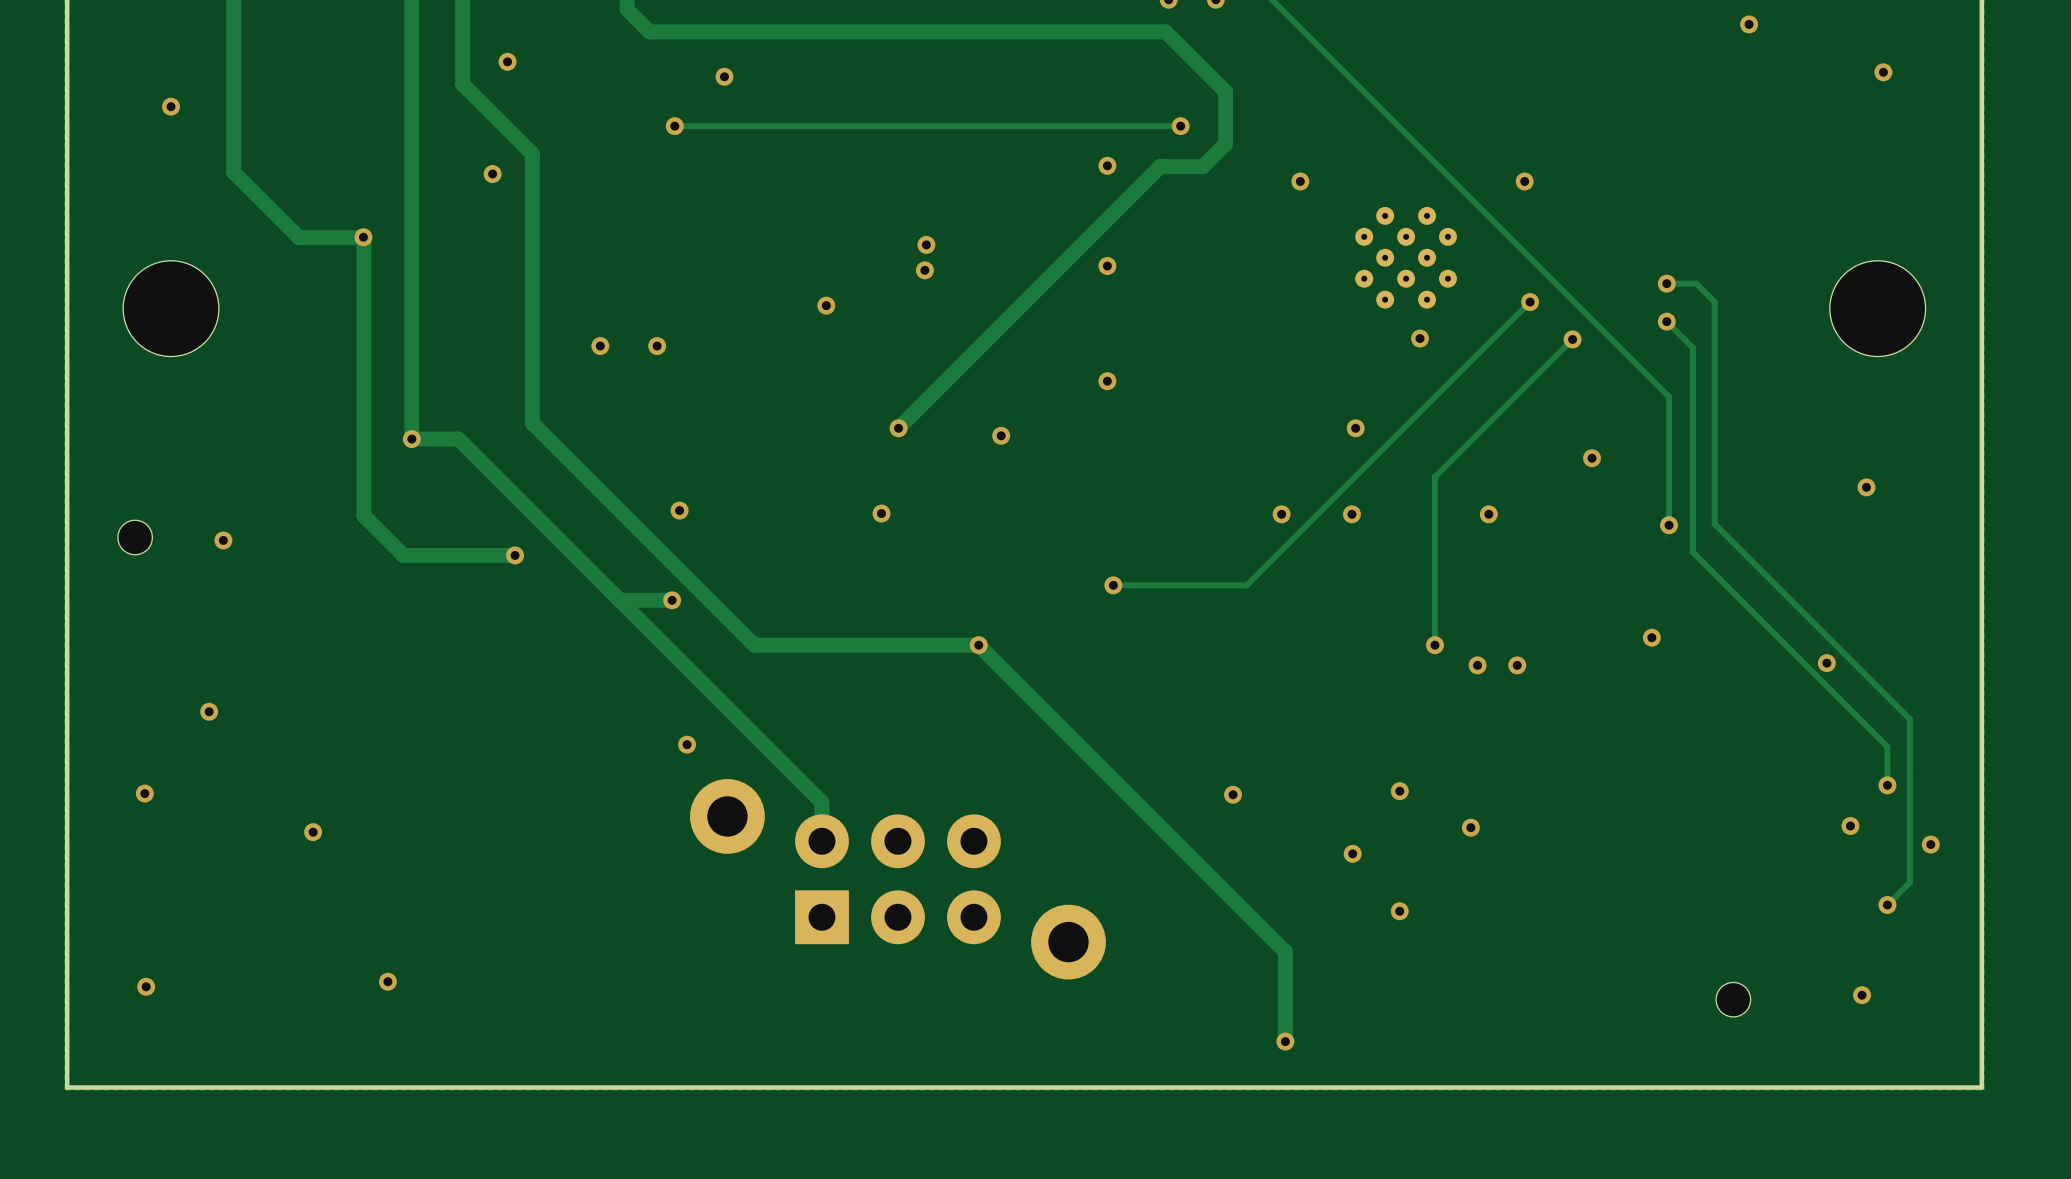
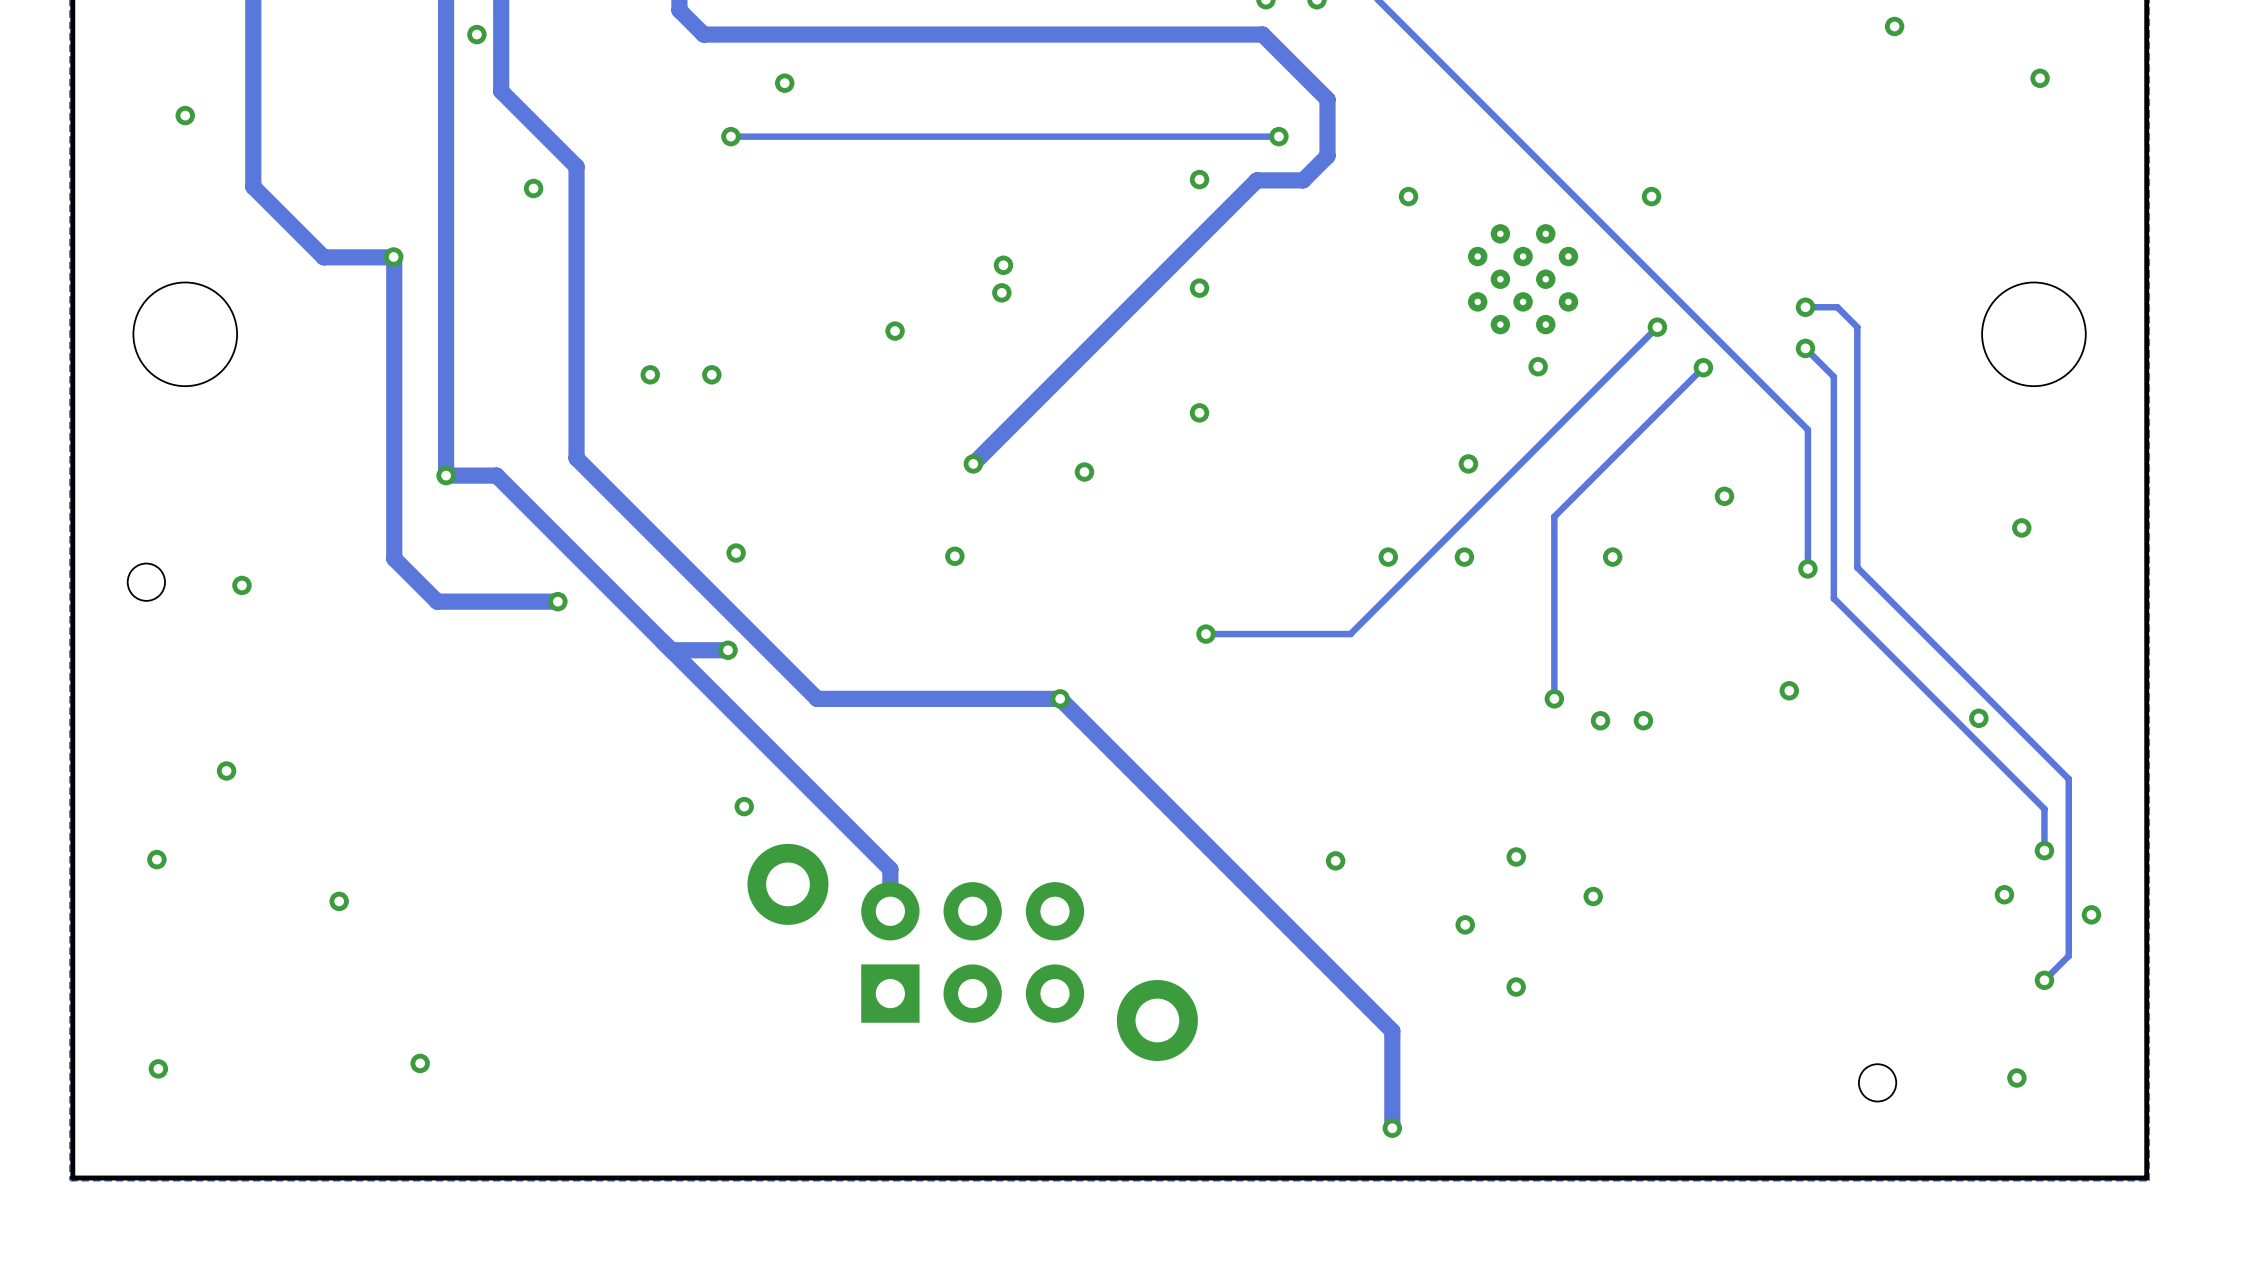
via position: (507, 61) -> (476, 34)

